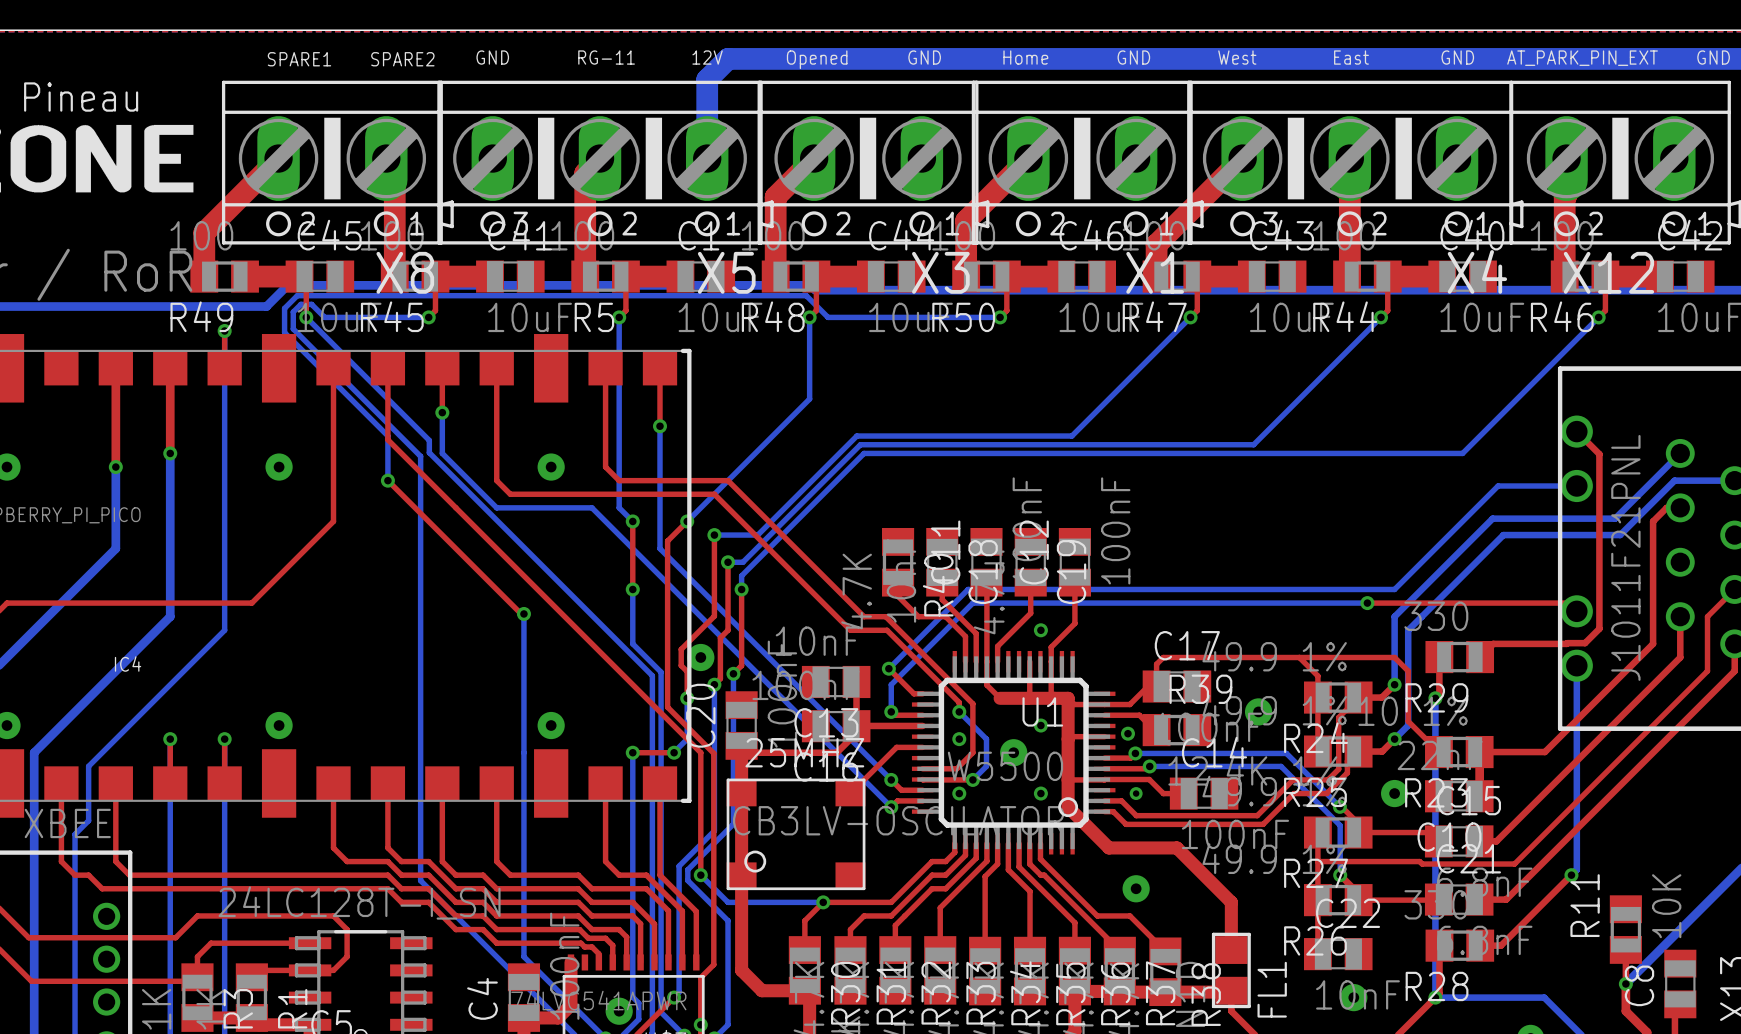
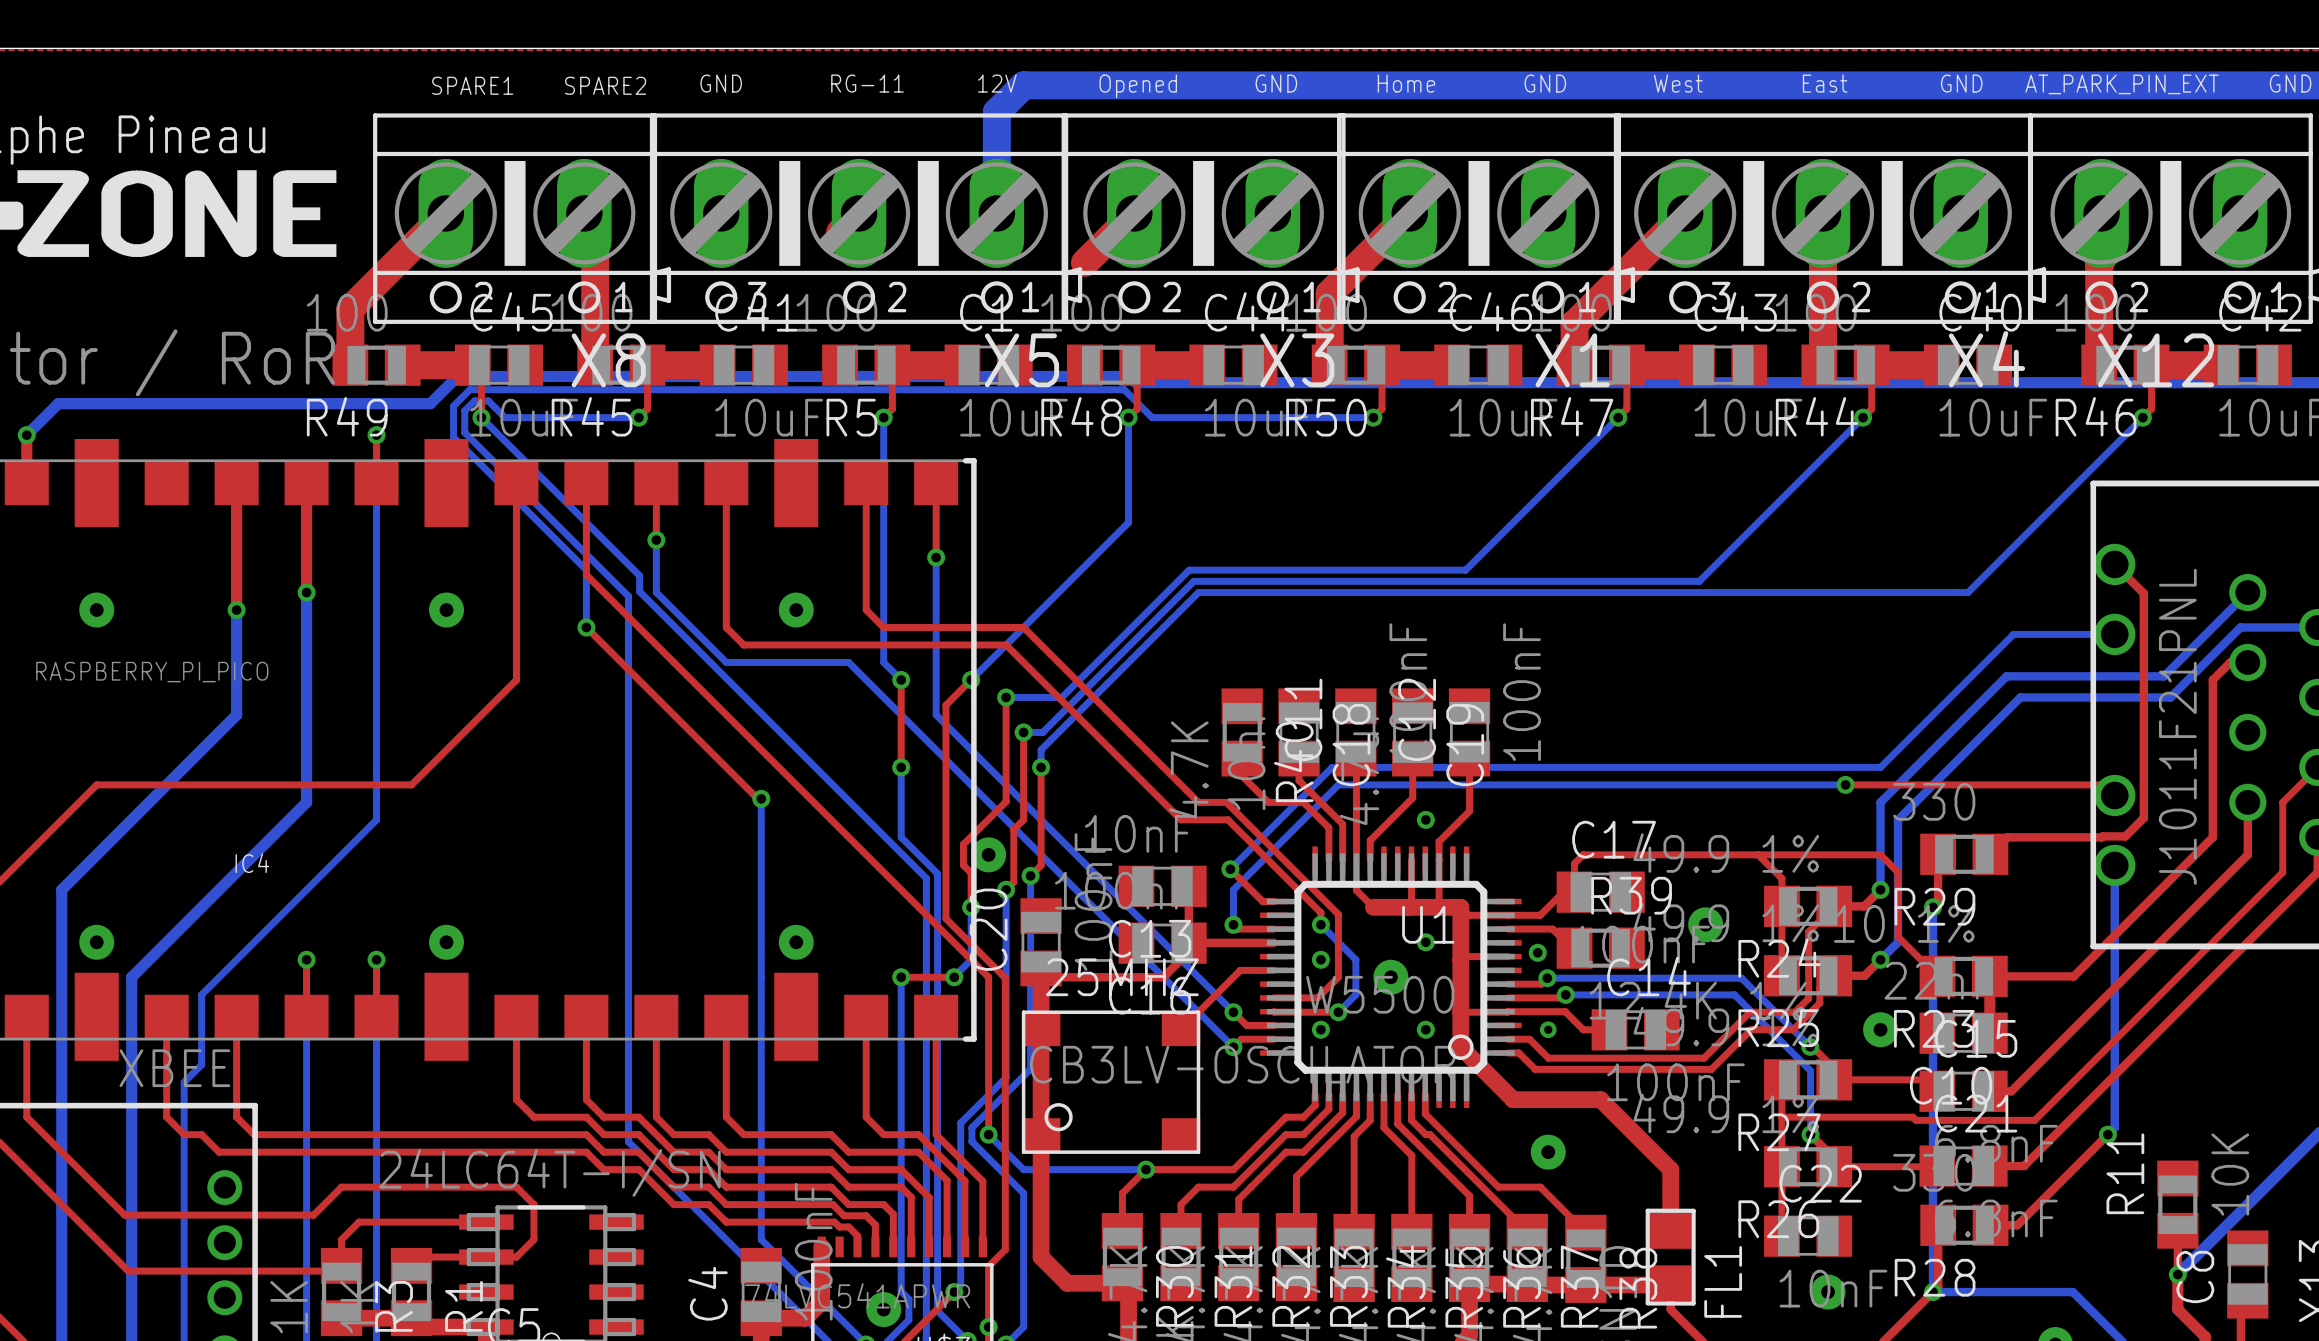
top track: (585, 173) (585, 276) -> none
top track: (775, 197) (775, 276) -> none
part value: 24LC128T-I_SN (359, 903) -> 24LC64T-I/SN (549, 1172)

